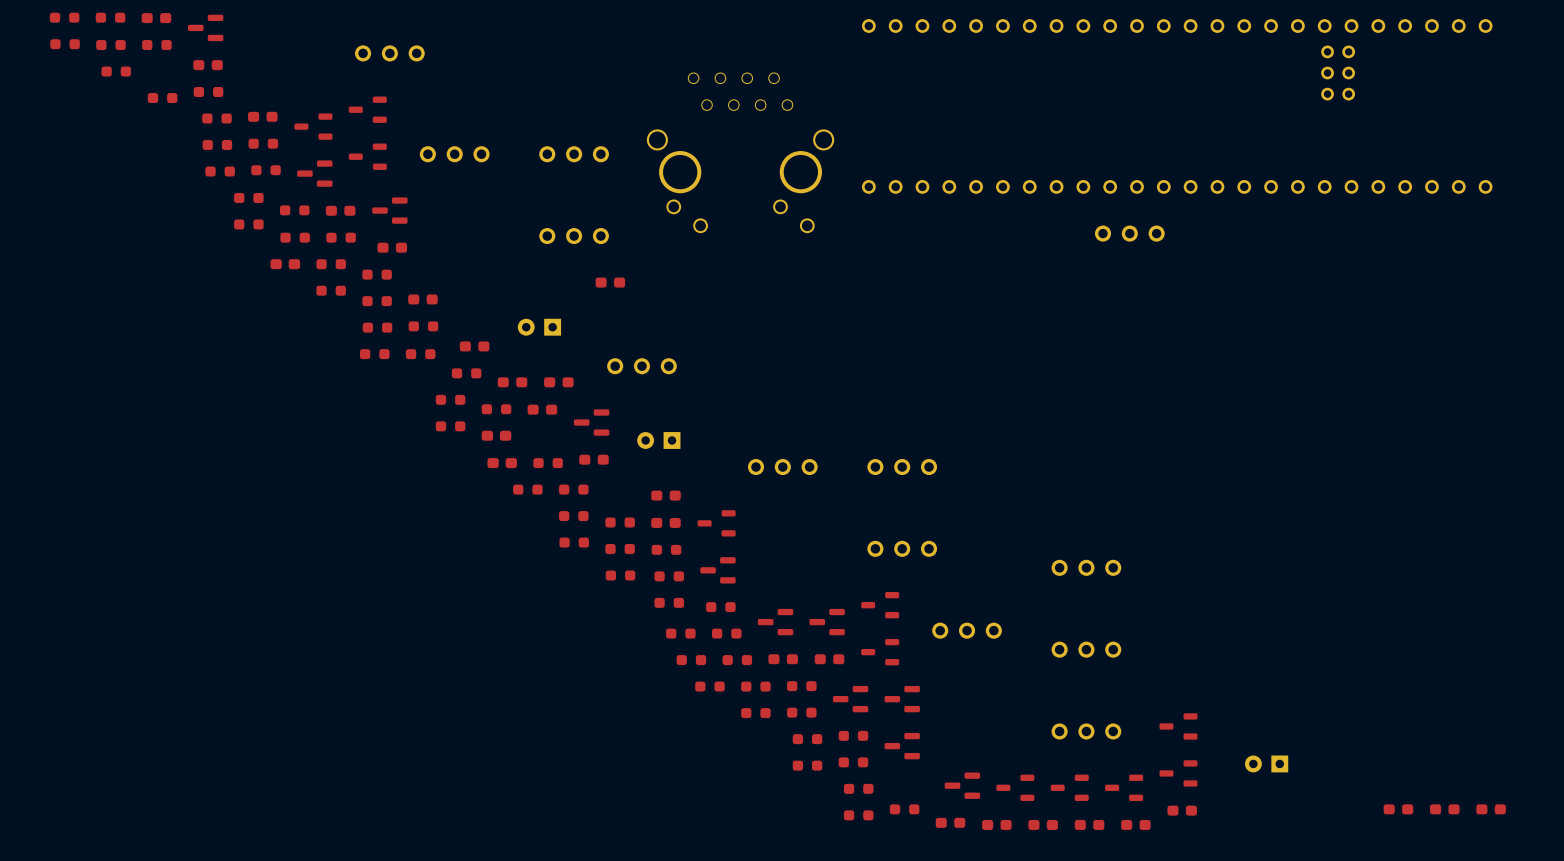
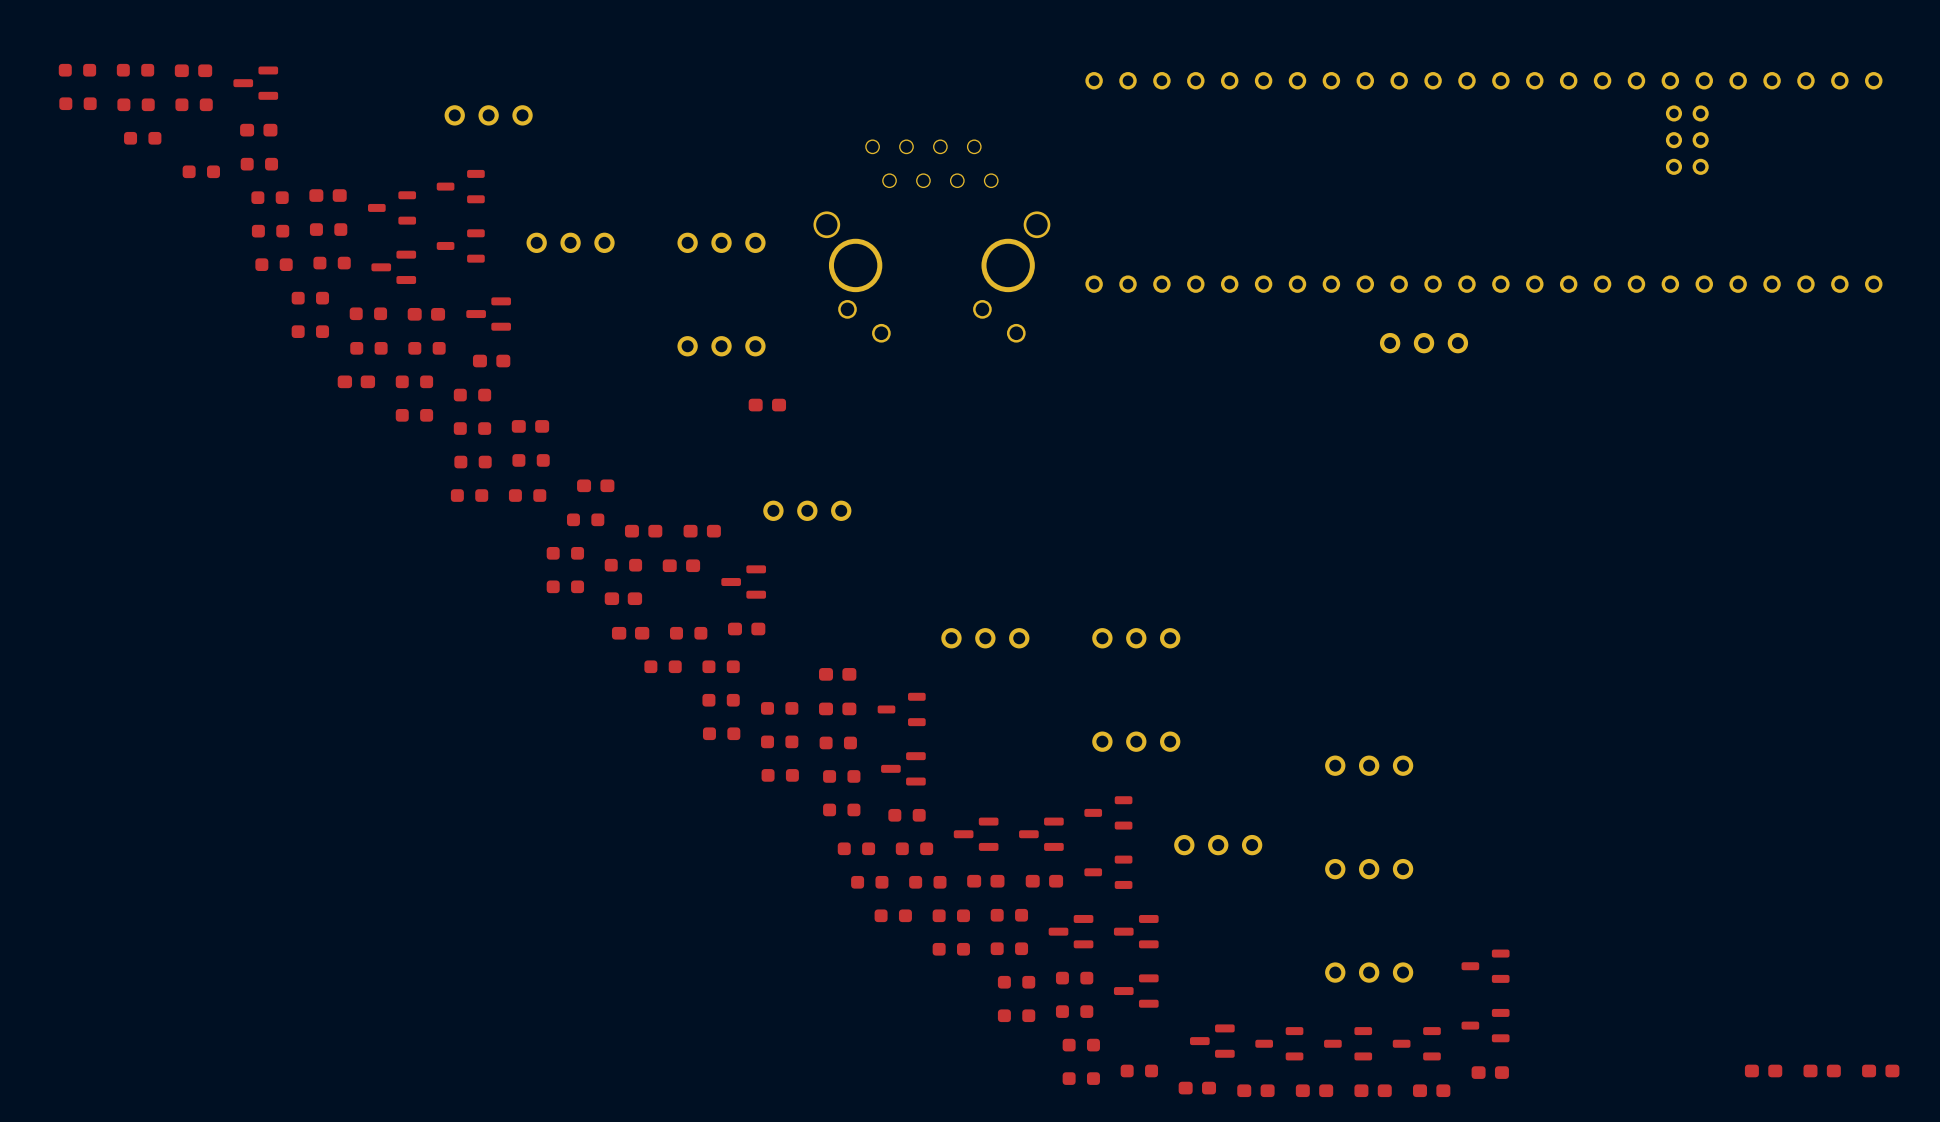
part: (539, 327) -> none
part: (658, 440) -> none
part: (1266, 763) -> none

